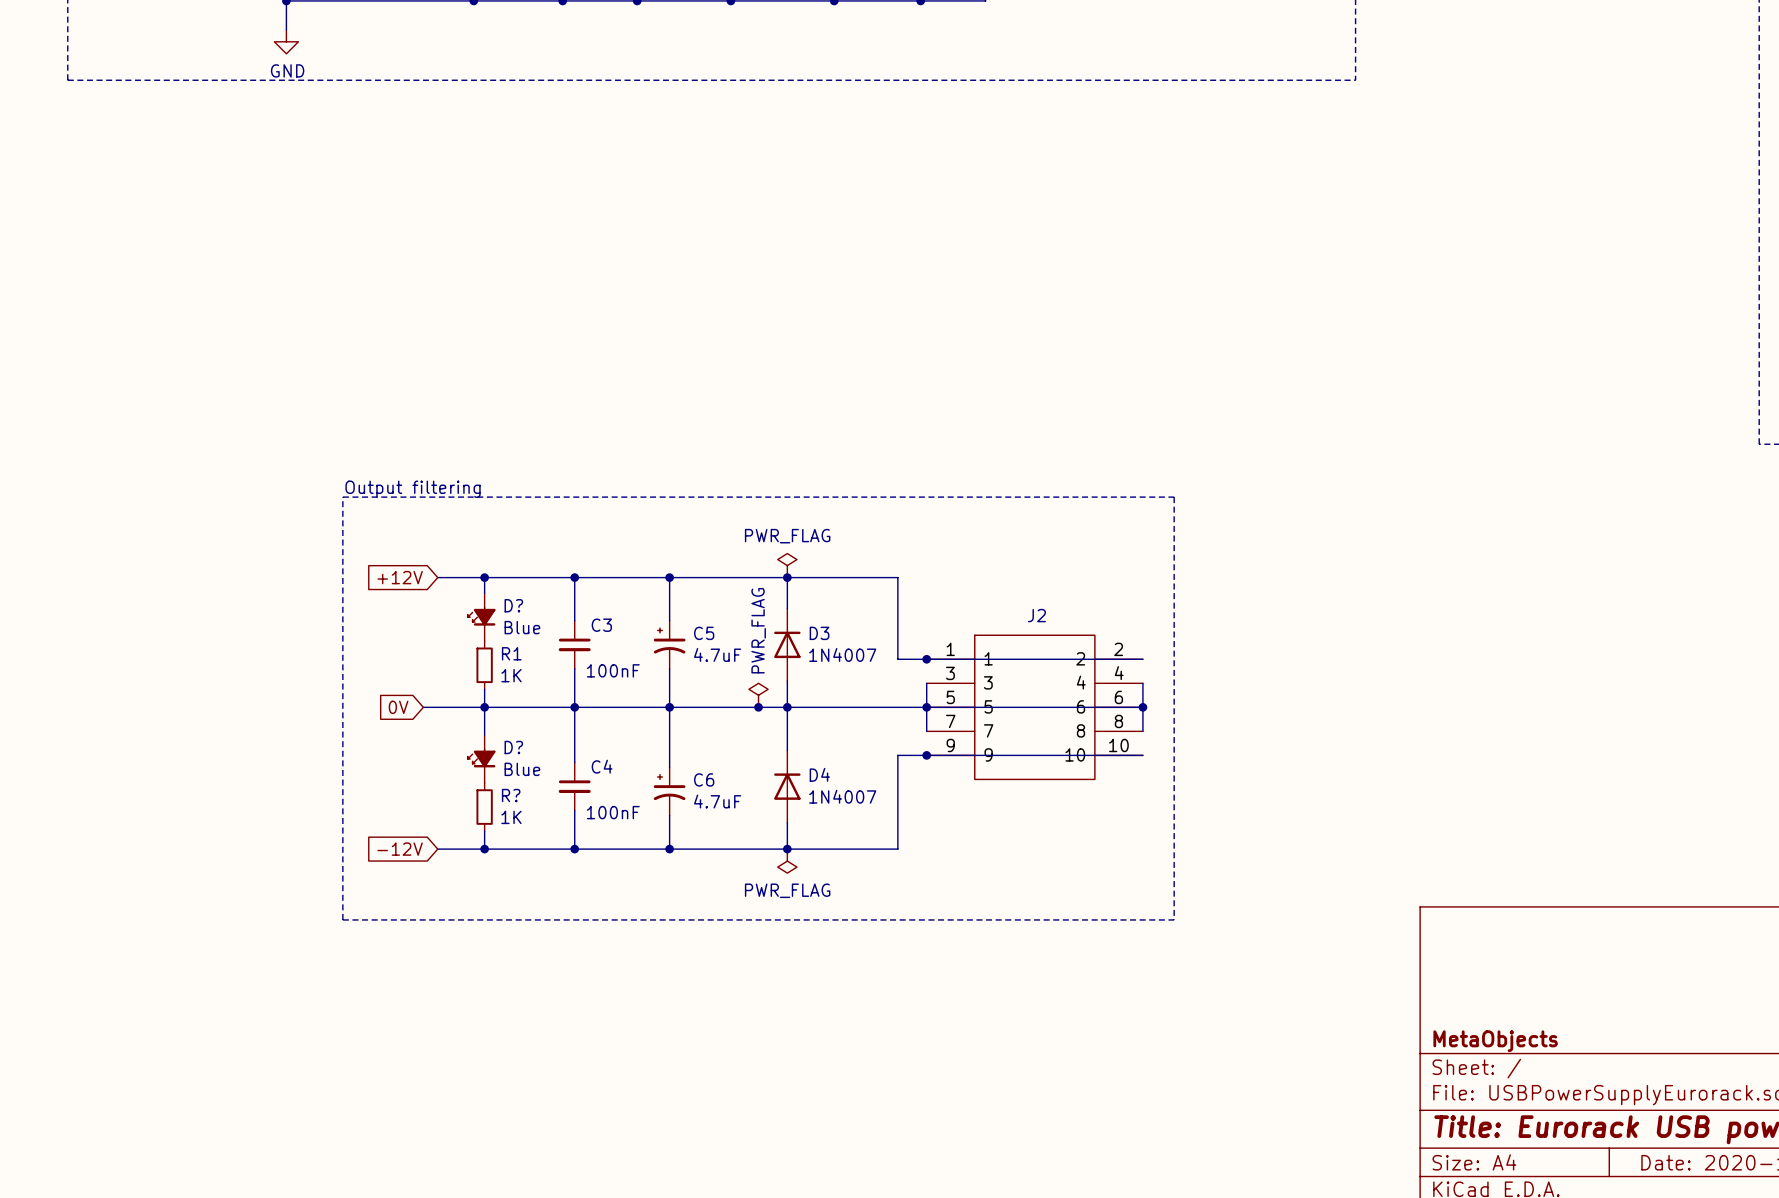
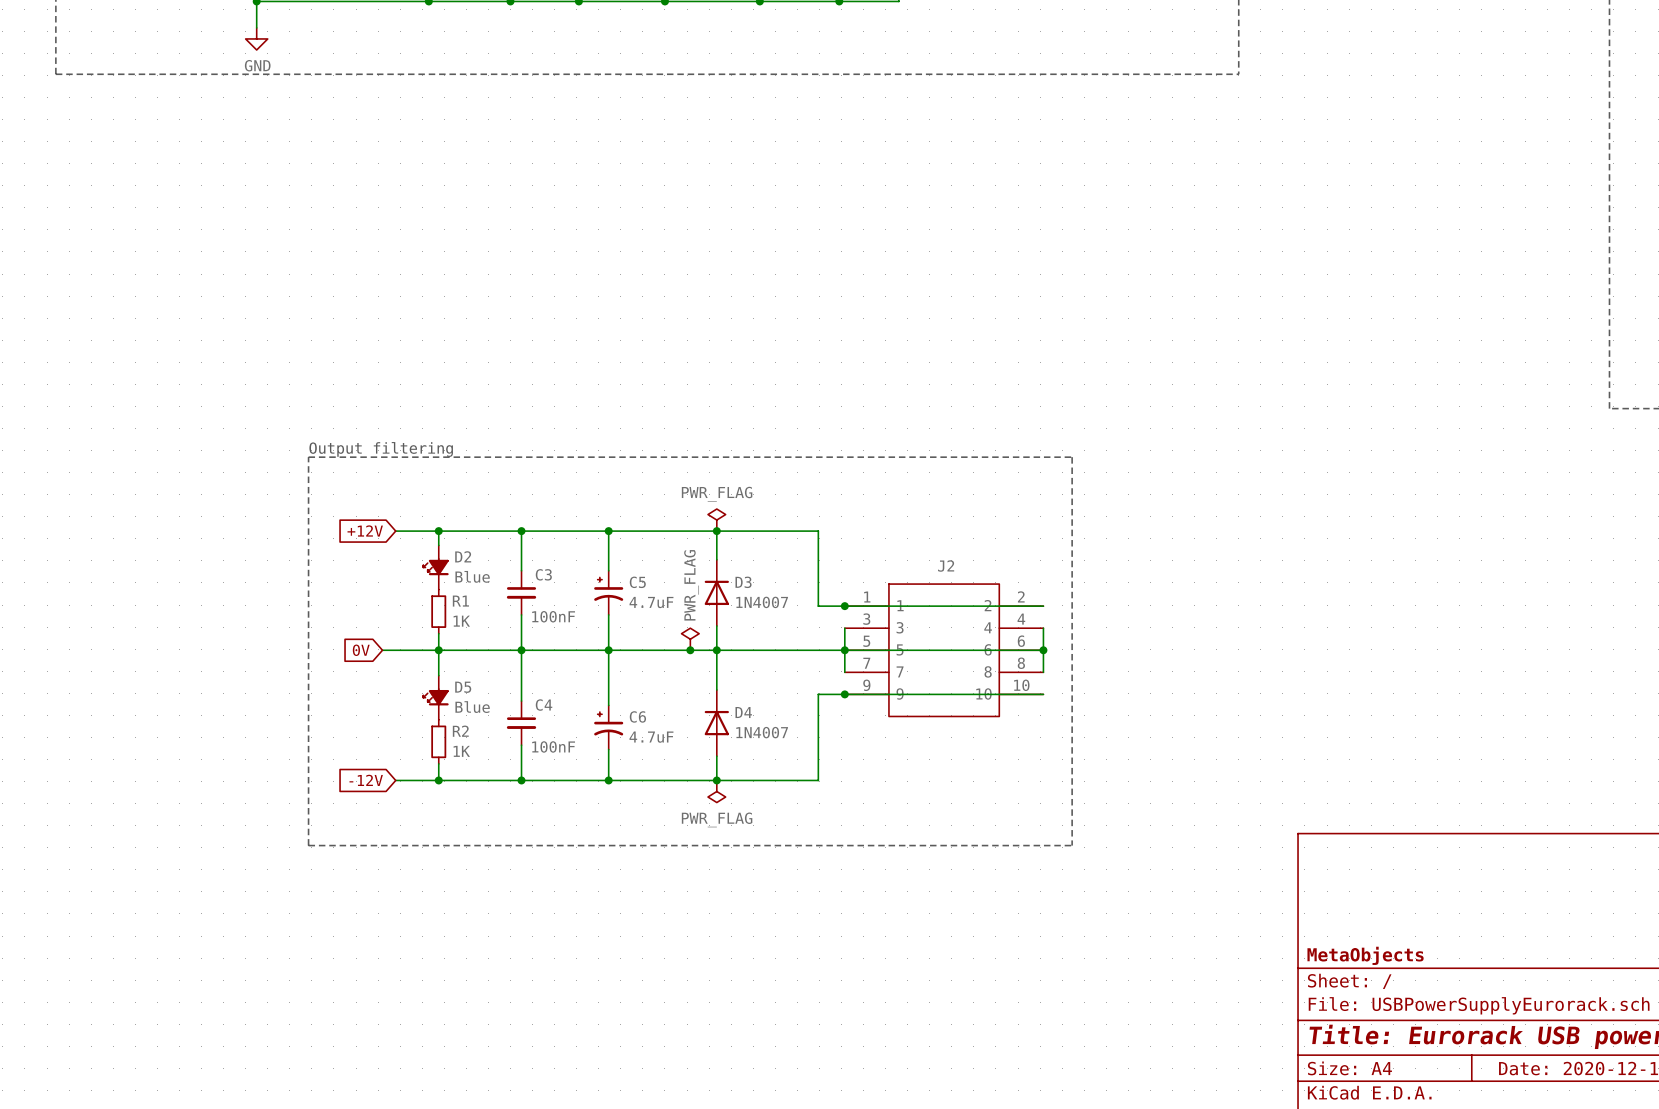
D? name: D? (513, 605) -> D2 (463, 556)
D? name: D? (513, 747) -> D5 (463, 687)
R? name: R? (511, 795) -> R2 (460, 731)

